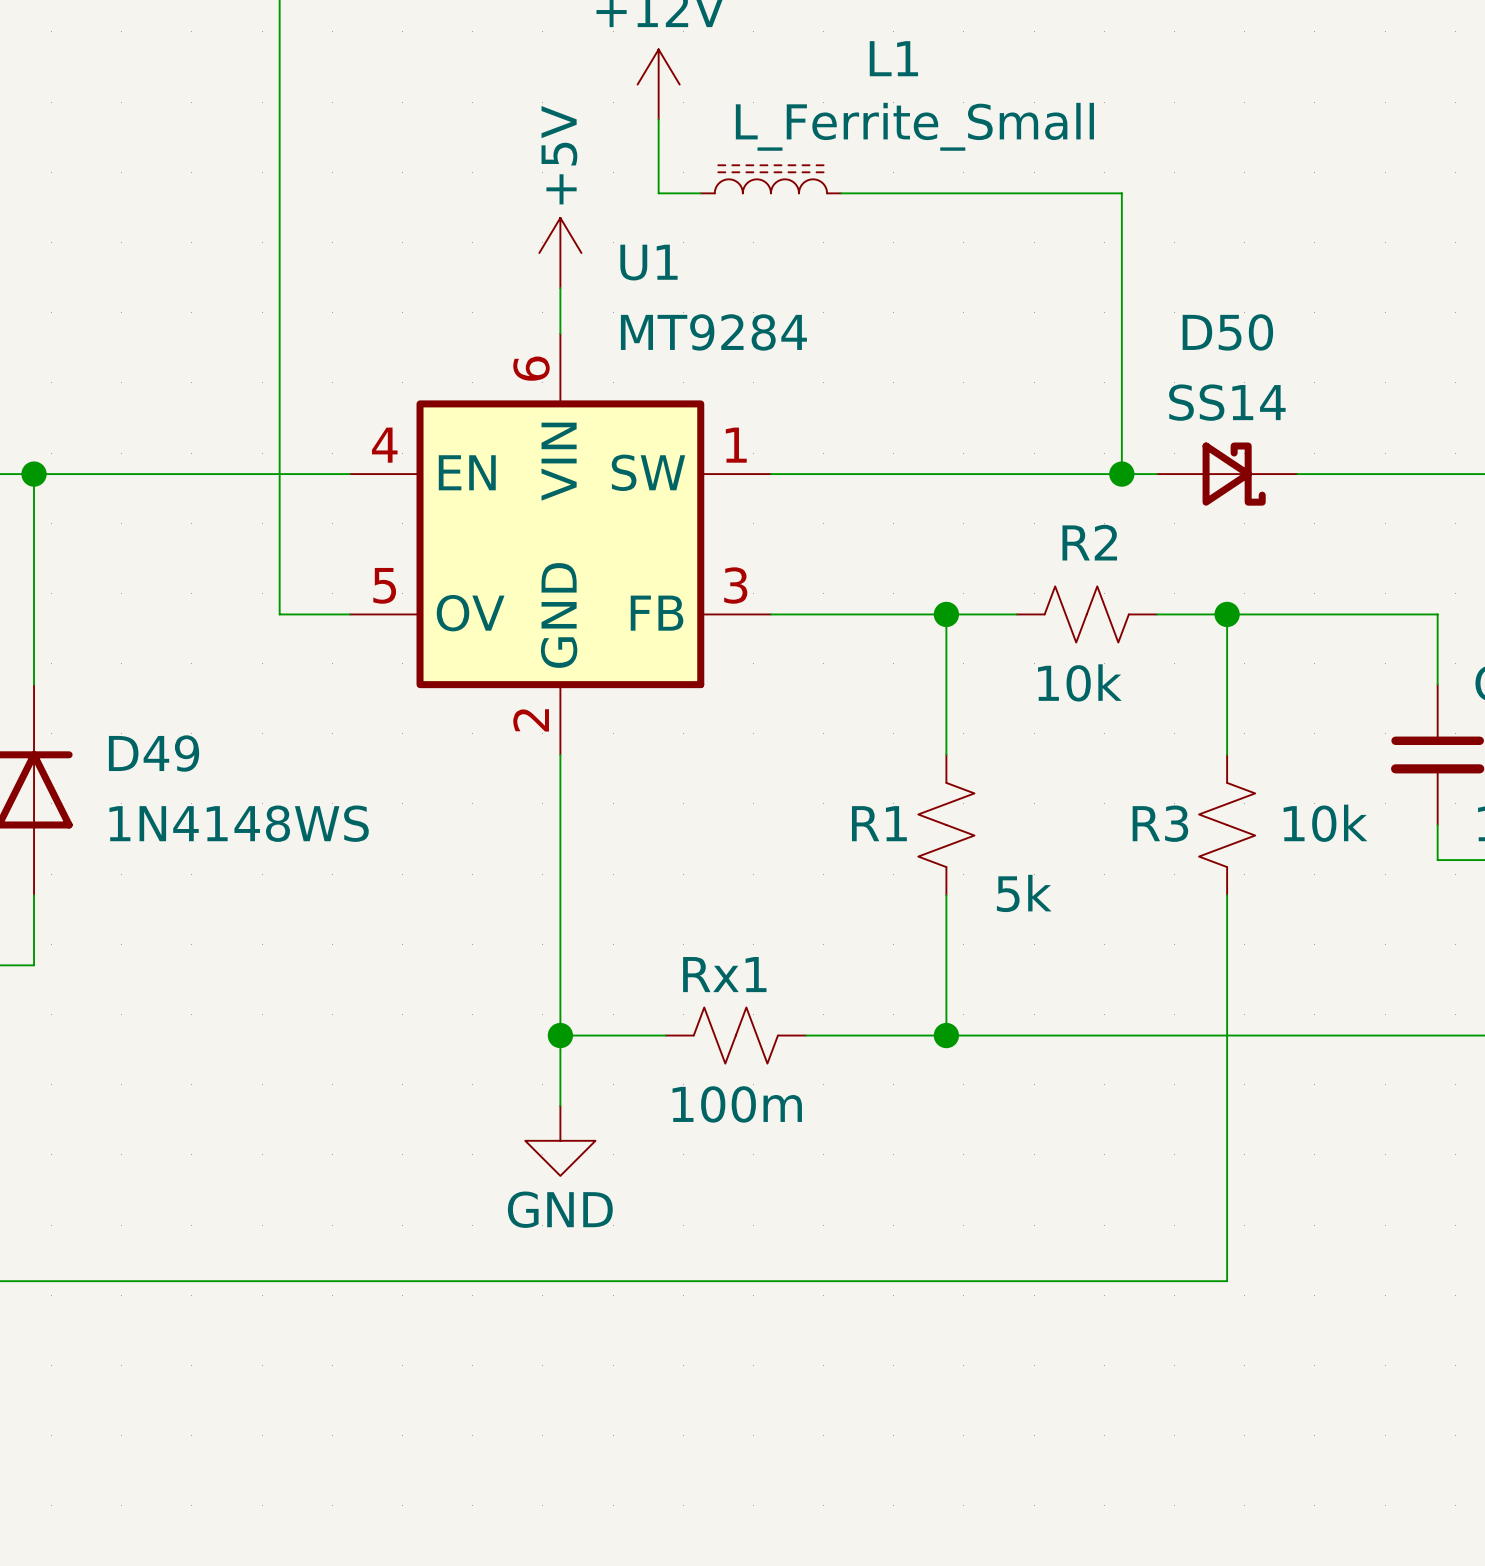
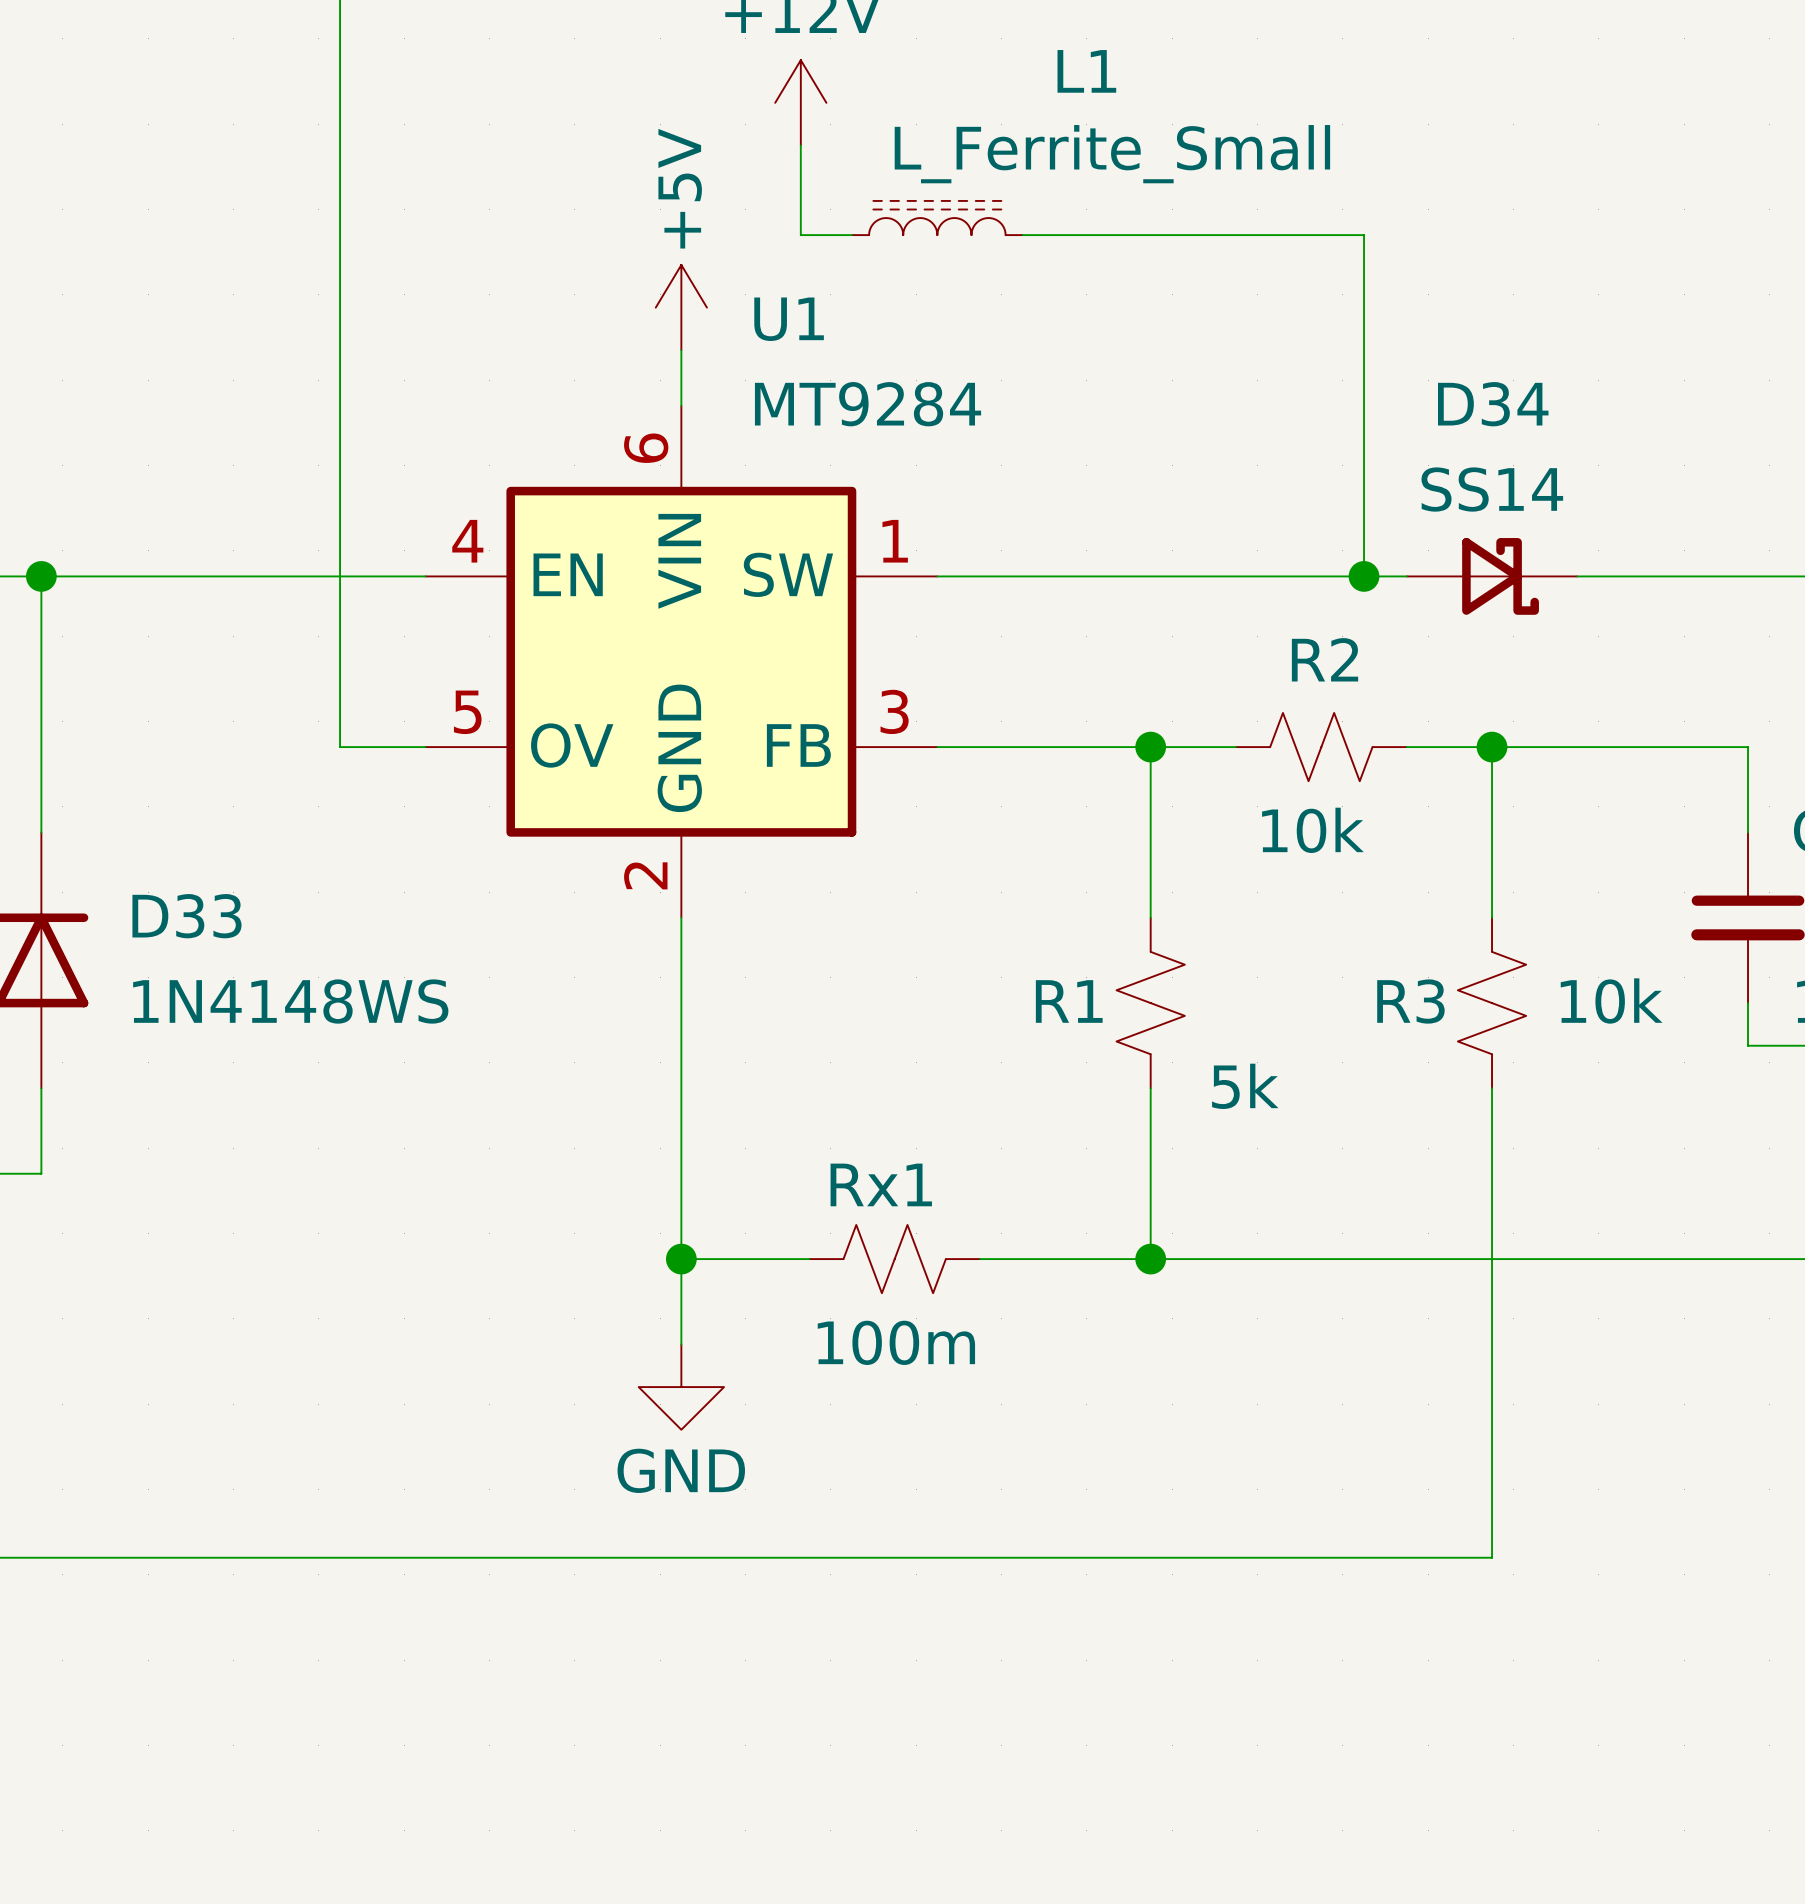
D50 name: D50 (1227, 332) -> D34 (1493, 404)
D49 name: D49 (154, 753) -> D33 (186, 916)

